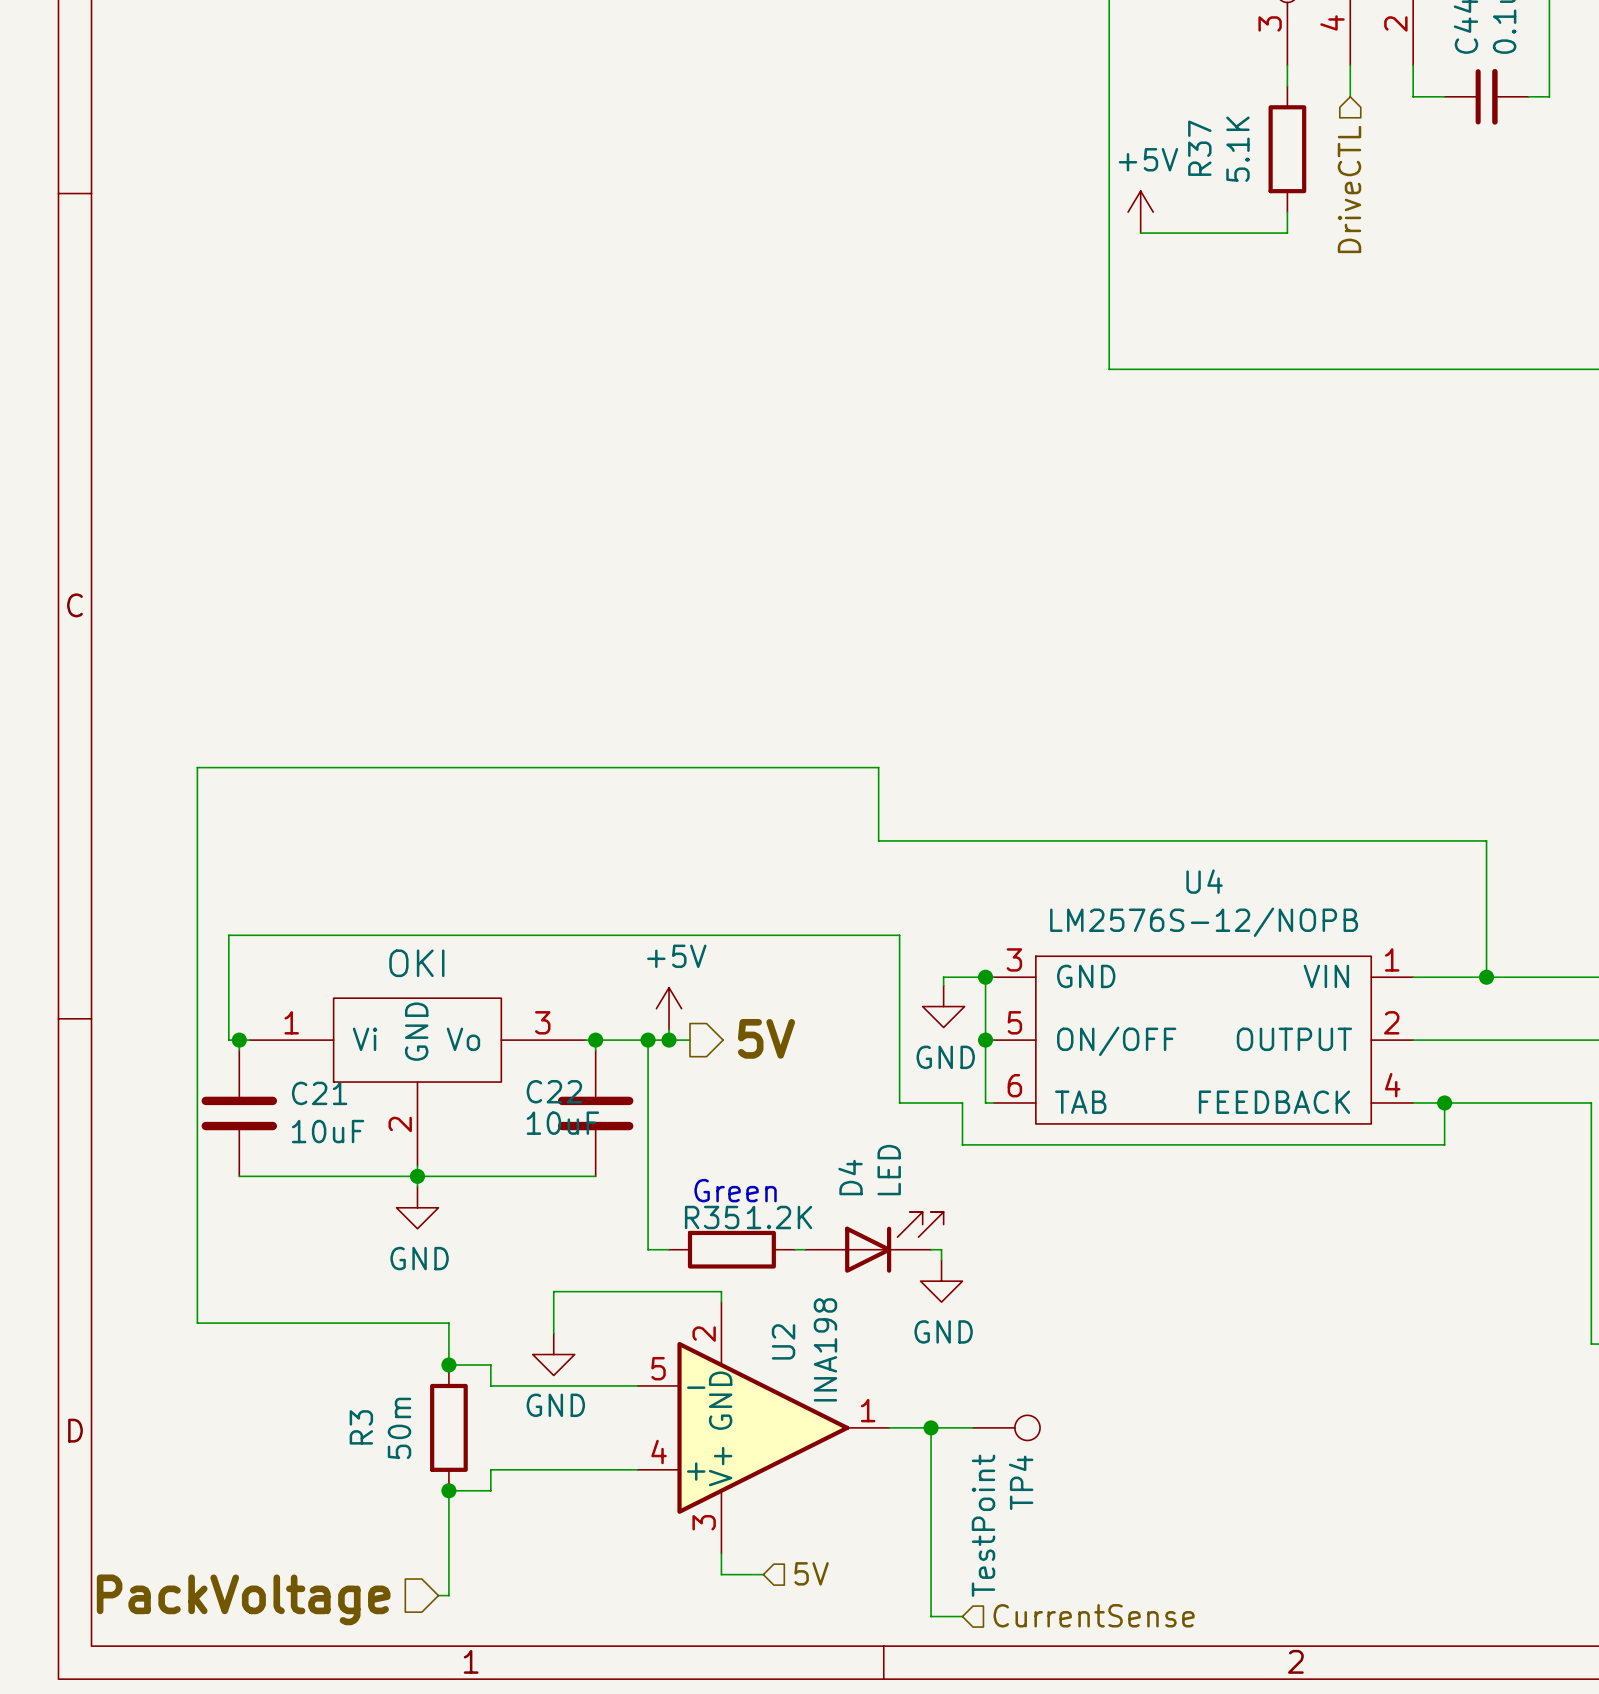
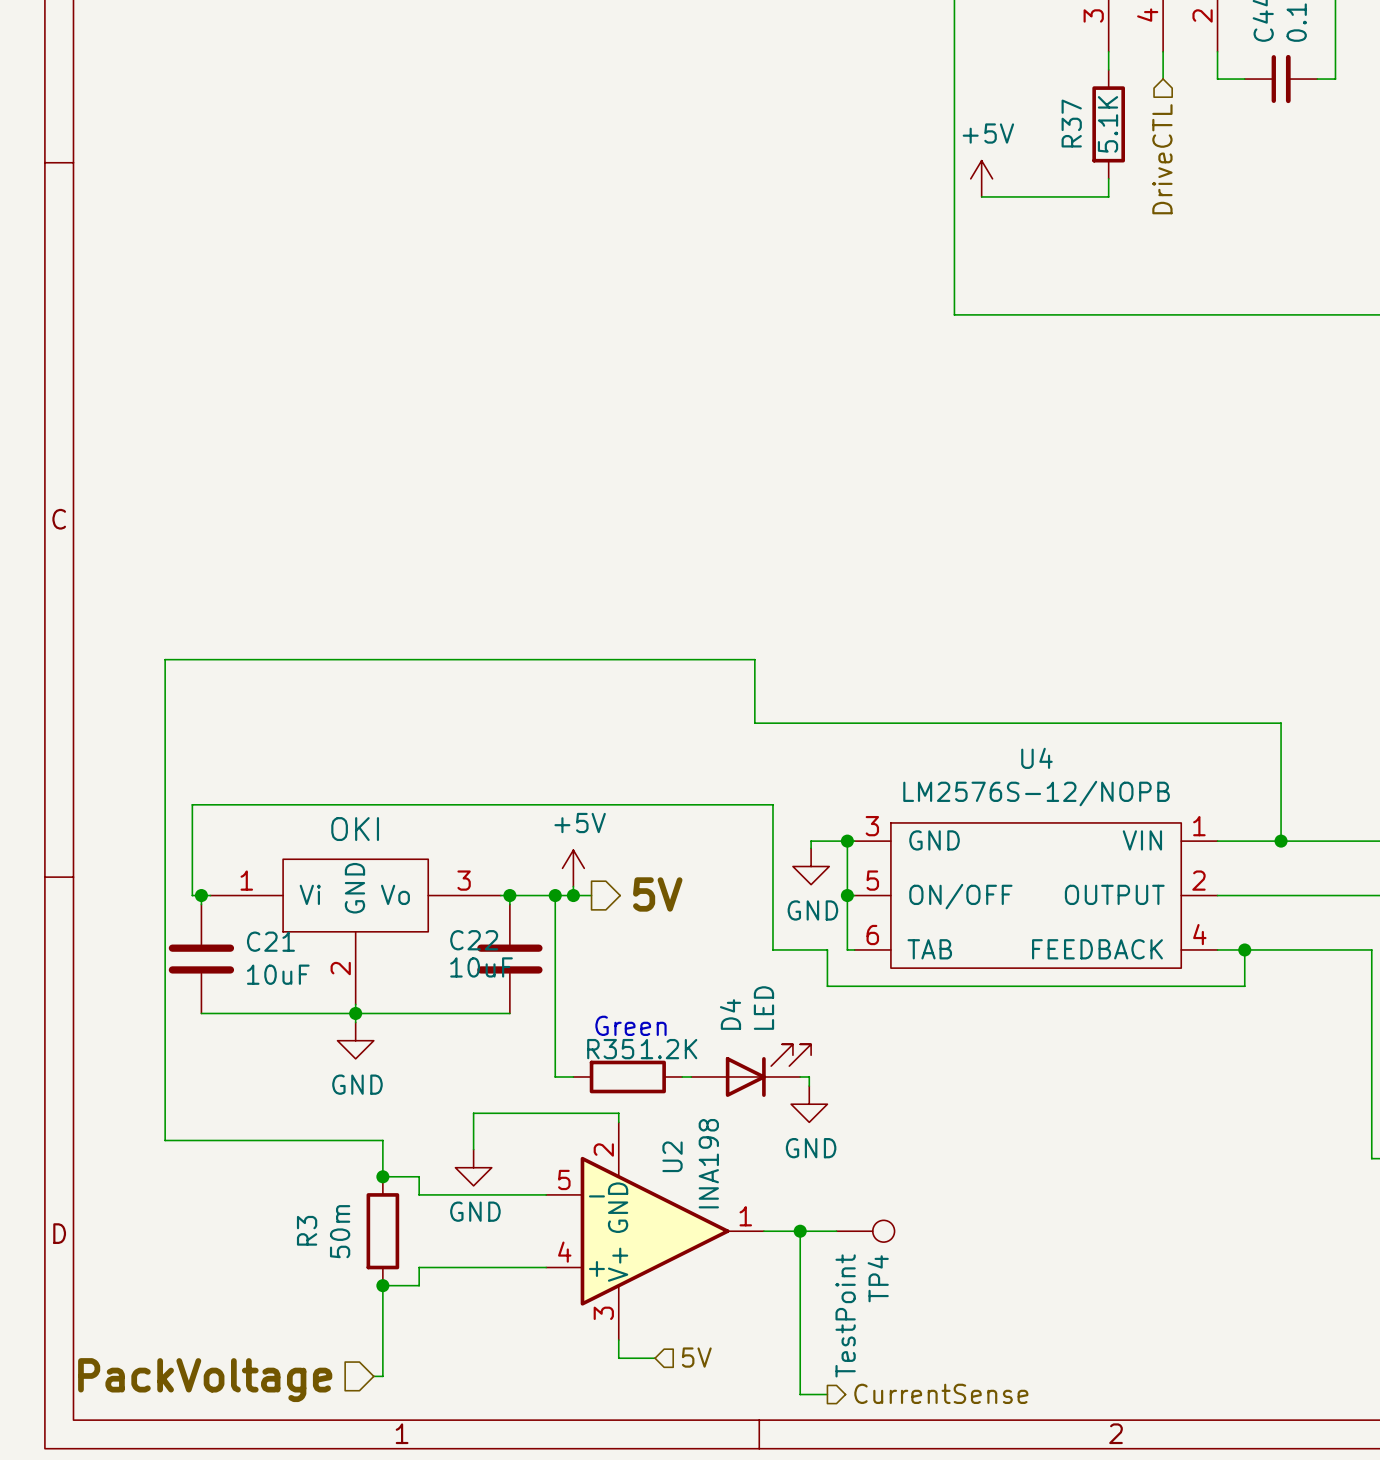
R37 name position: R37 (1199, 148) -> R37 (1071, 123)
R37 value position: 5.1K (1237, 149) -> 5.1K (1107, 124)
hierarchical label shape: input (1094, 1615) -> output (941, 1393)

